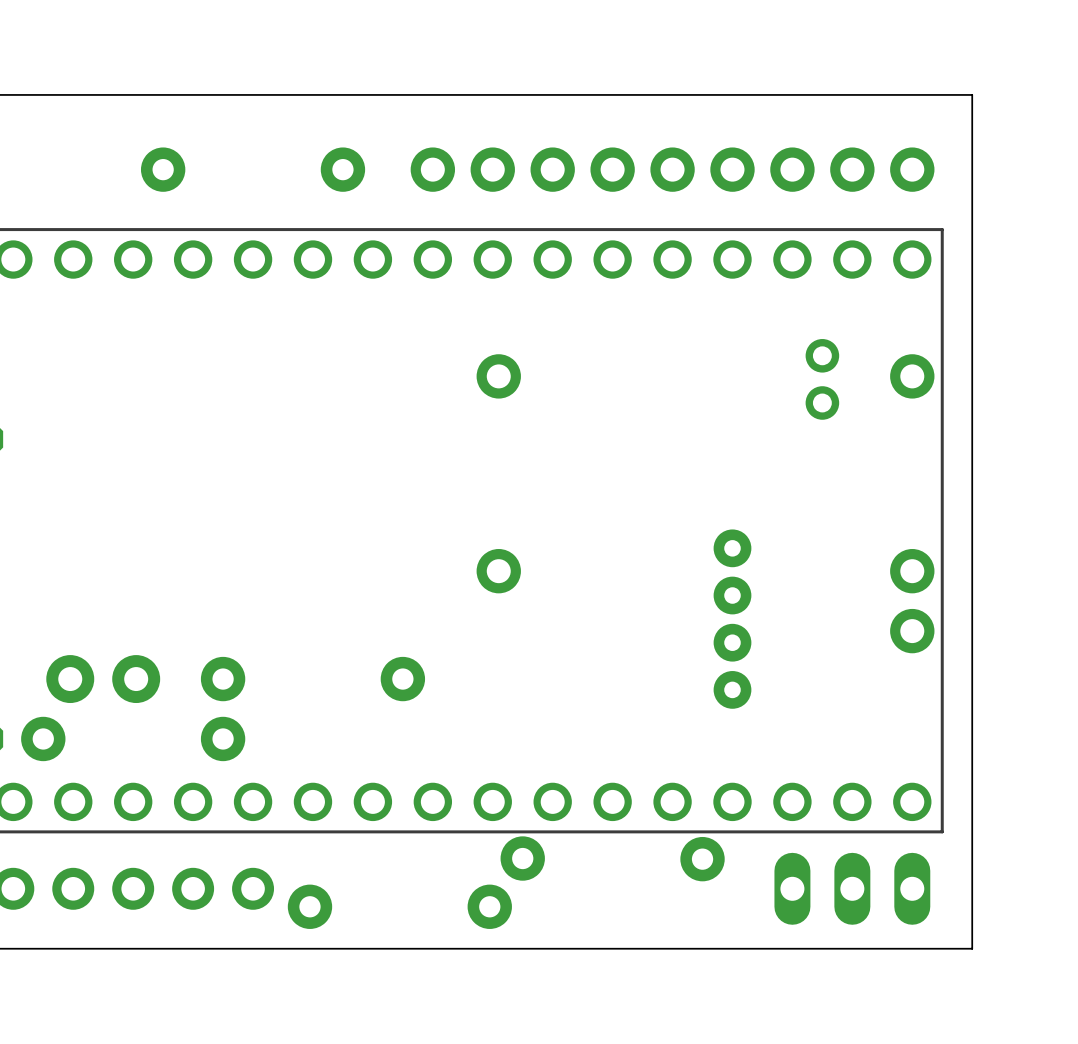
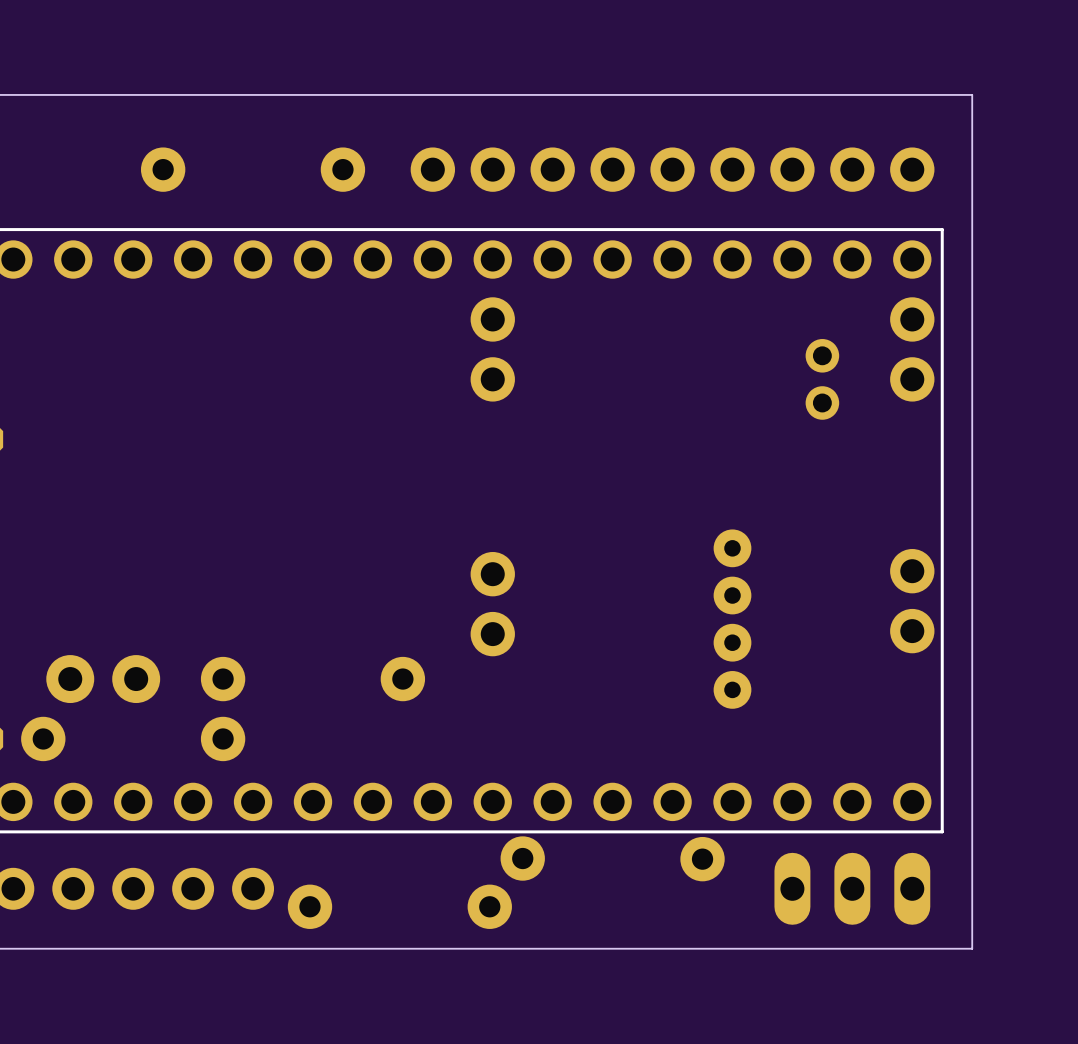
part: none -> (492, 349)
part: none -> (912, 349)
part: (498, 376) -> none
part: (912, 376) -> none
part: (498, 571) -> none
part: none -> (492, 604)

